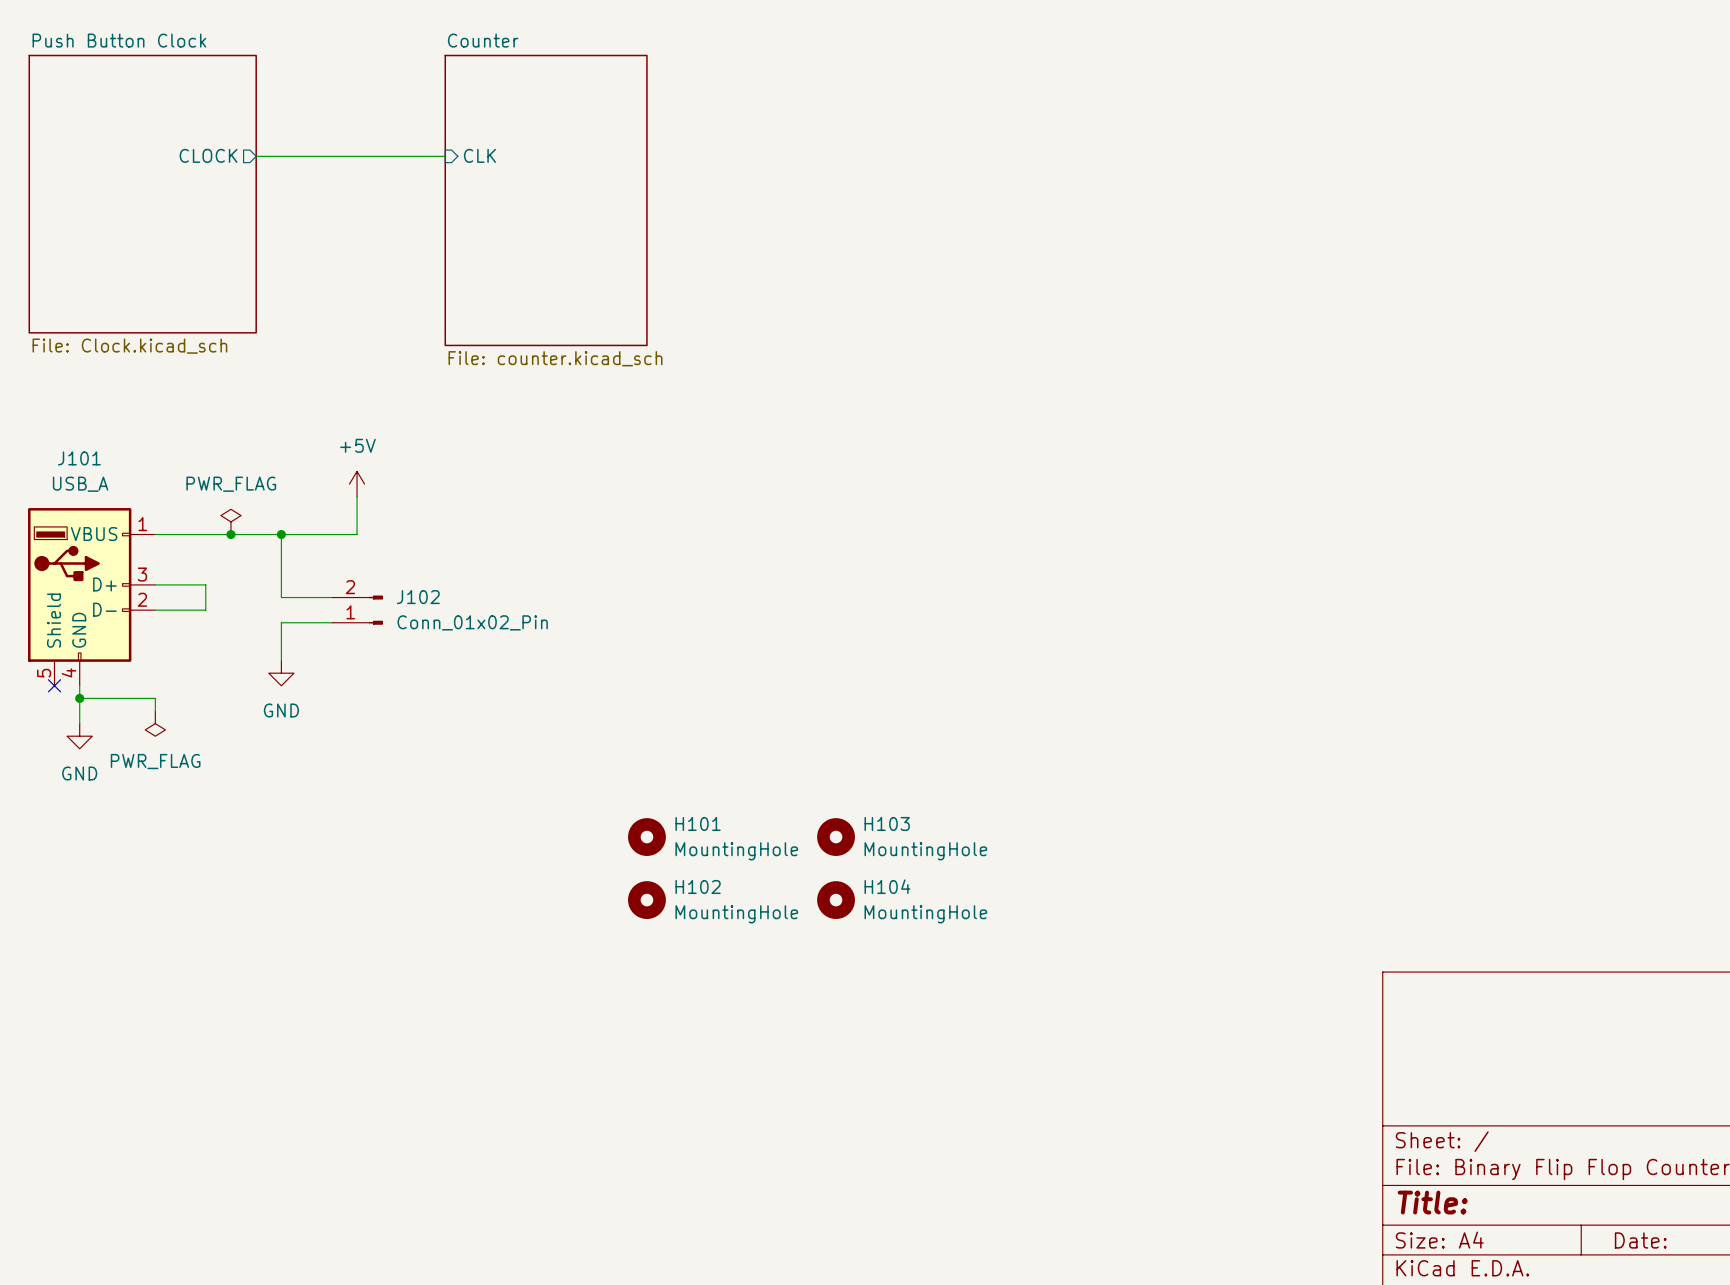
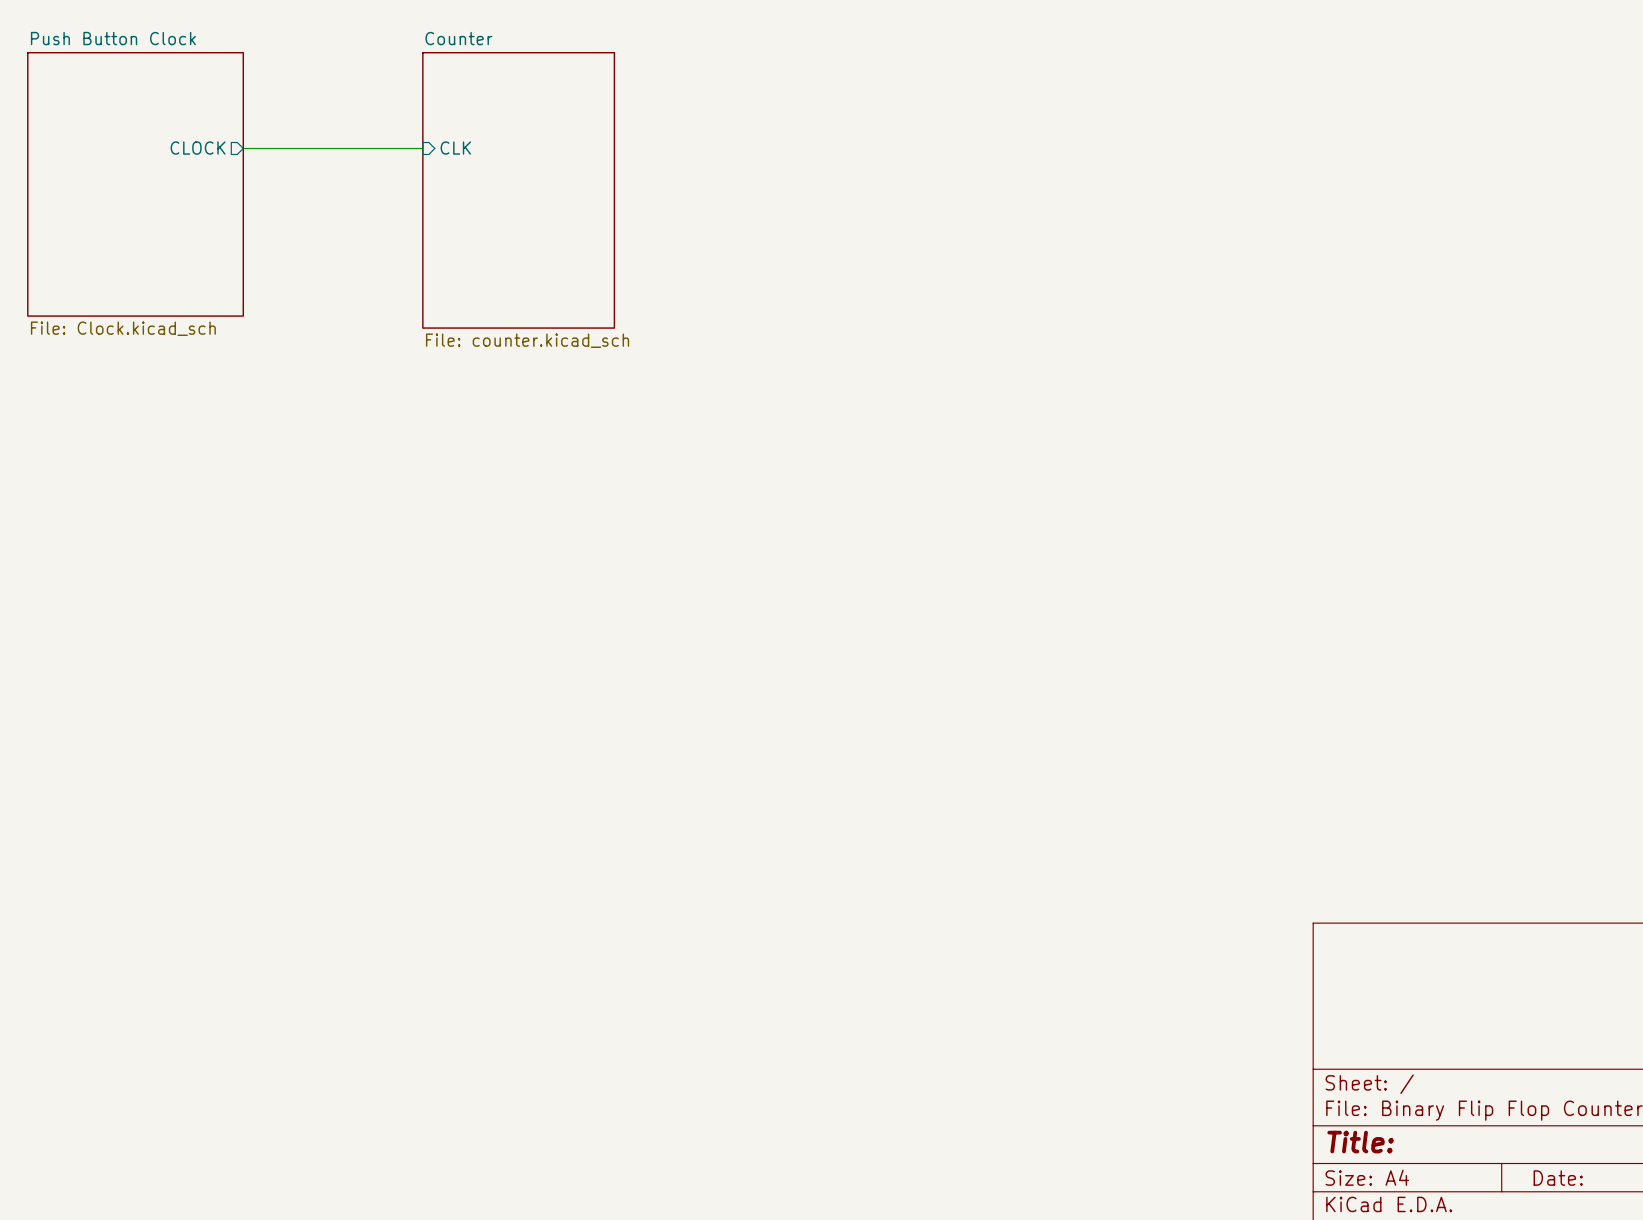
power symbol: +5V (357, 484) -> none
wire: (357, 496) (357, 534) (155, 534) -> none
power symbol: PWR_FLAG (230, 521) -> none
junction: (230, 534) -> none
wire: (281, 534) (281, 597) (331, 597) -> none
junction: (281, 534) -> none
wire: (155, 584) (205, 584) (205, 610) (155, 610) -> none
J101: USB_A (91, 596) -> none
J102: Conn_01x02_Pin (357, 610) -> none
wire: (331, 622) (281, 622) (281, 660) -> none
power symbol: GND (281, 673) -> none
no-connect mark: (54, 685) -> none
wire: (79, 685) (79, 723) -> none
wire: (79, 698) (155, 698) (155, 710) -> none
junction: (79, 698) -> none
power symbol: PWR_FLAG (155, 723) -> none
power symbol: GND (79, 736) -> none
H101: MountingHole (646, 837) -> none
H103: MountingHole (836, 837) -> none
H102: MountingHole (646, 900) -> none
H104: MountingHole (836, 900) -> none

